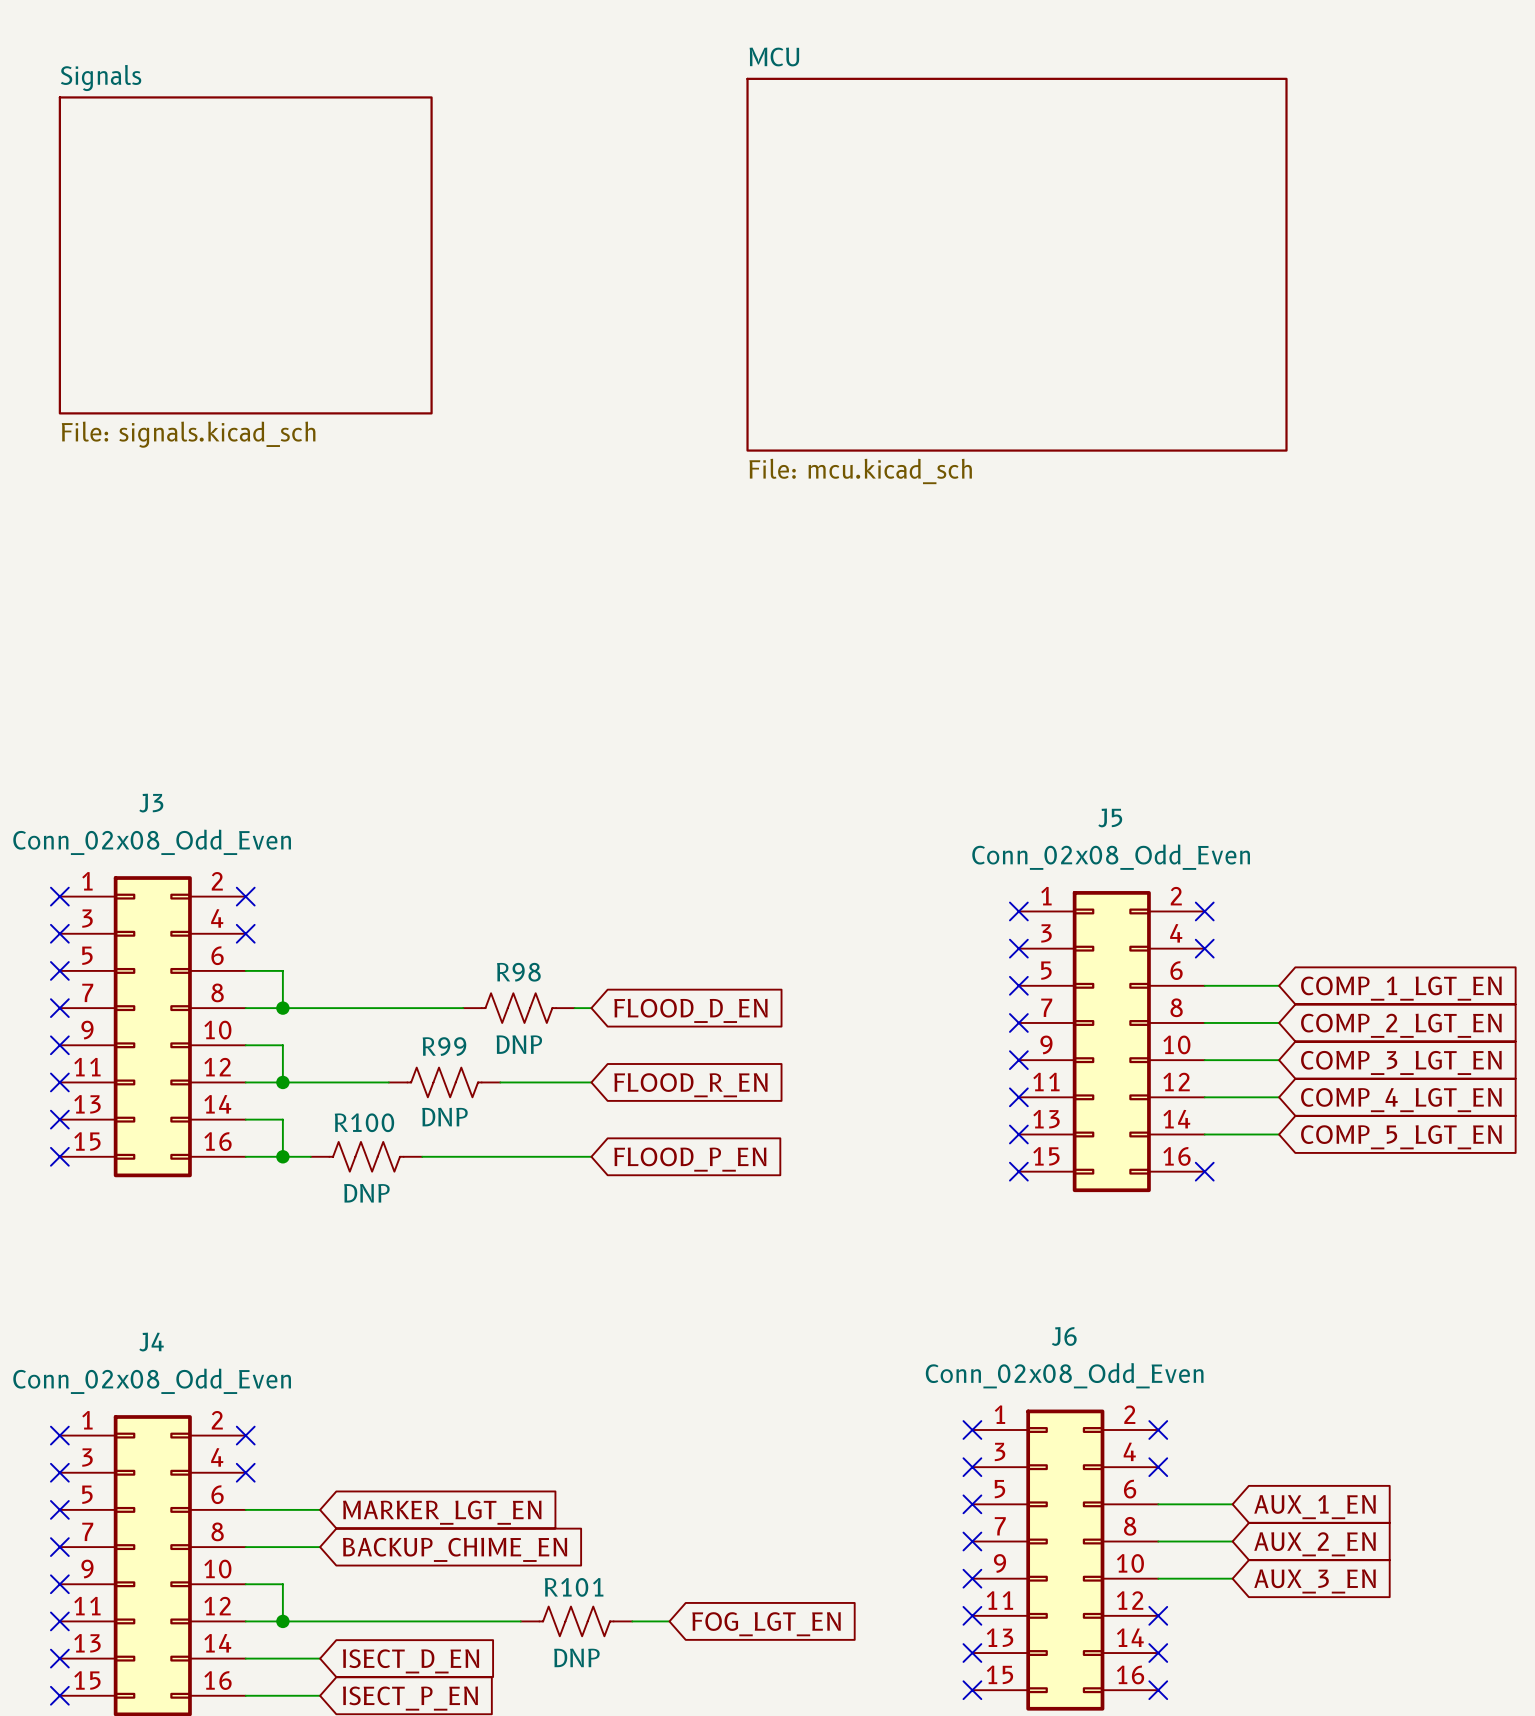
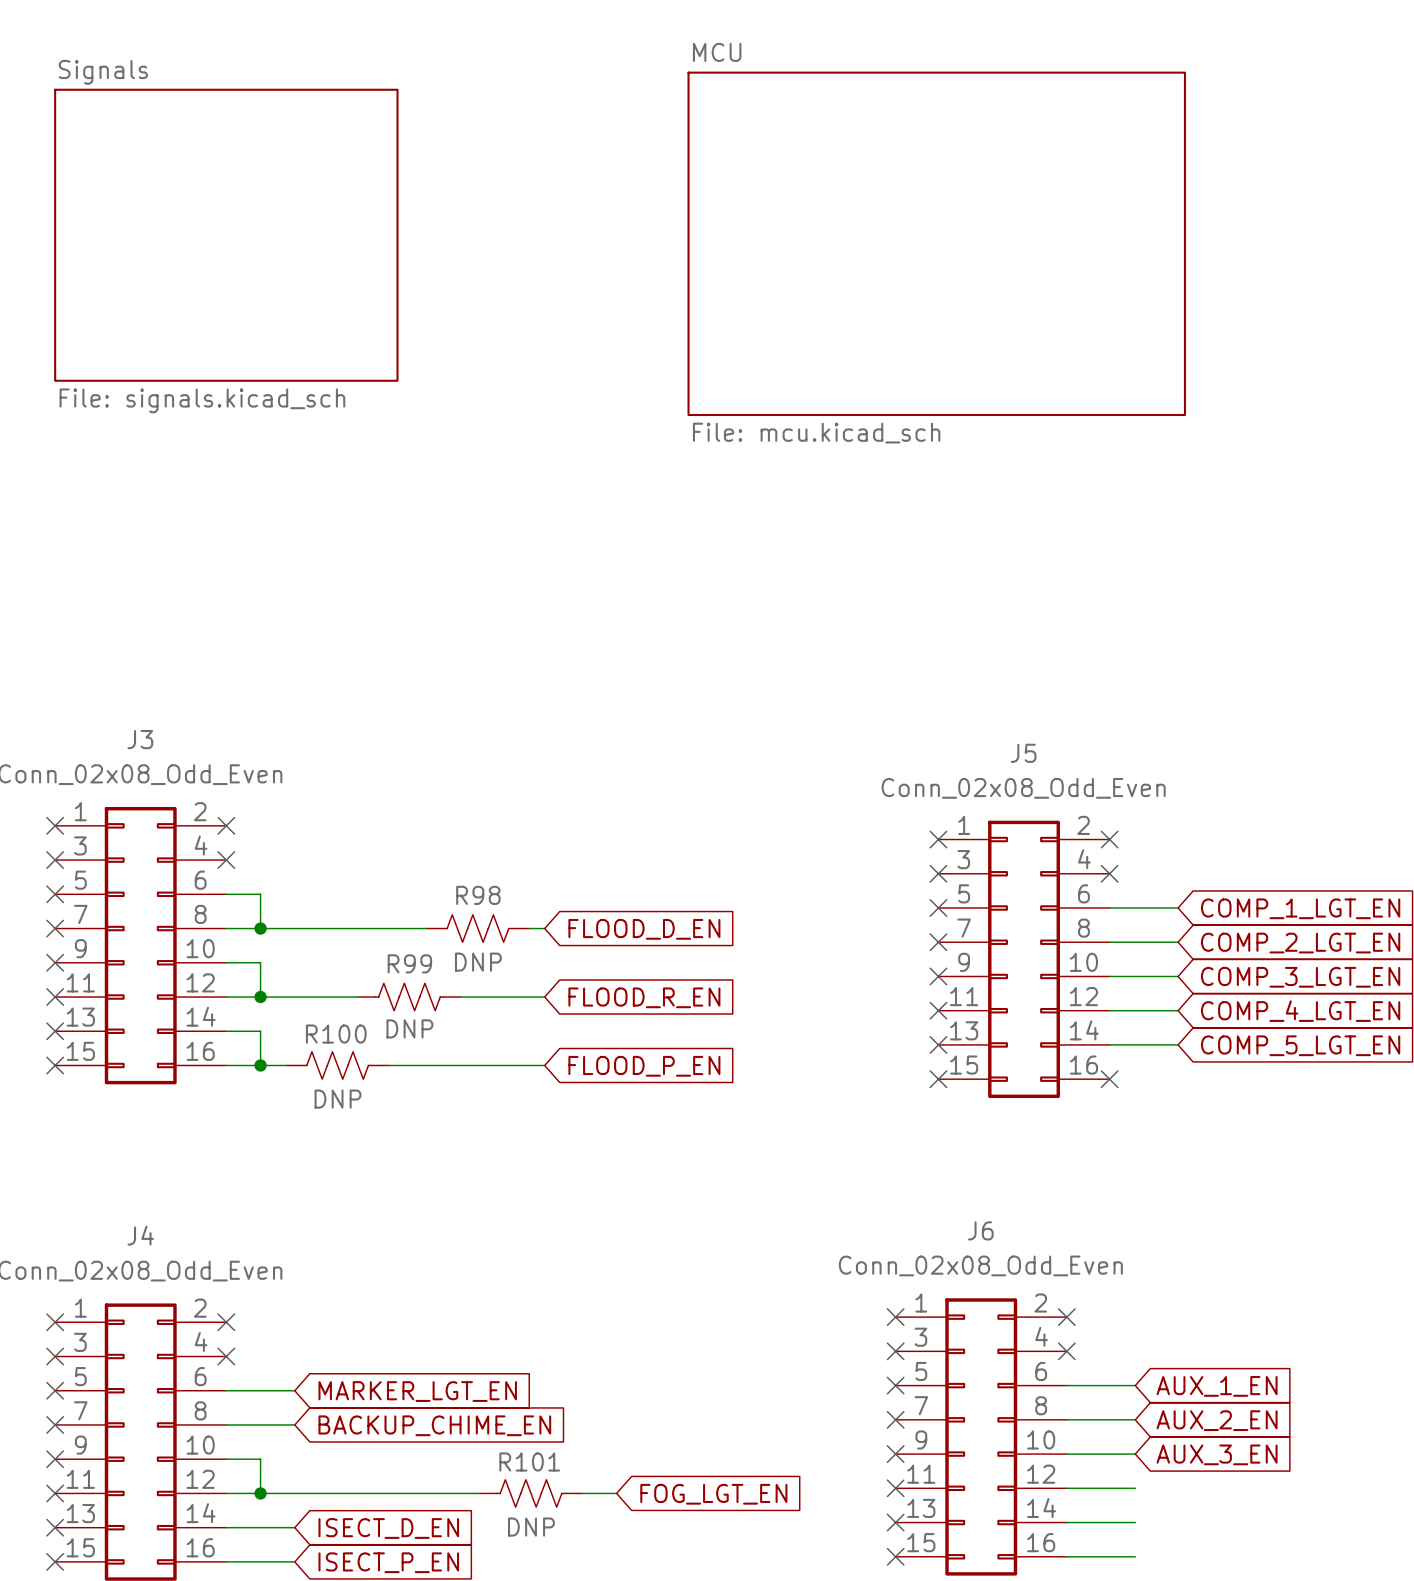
wire: none -> (1066, 1488) (1135, 1488)
no-connect mark: (1158, 1615) -> none
wire: none -> (1066, 1522) (1135, 1522)
no-connect mark: (1158, 1653) -> none
wire: none -> (1066, 1556) (1135, 1556)
no-connect mark: (1158, 1690) -> none

